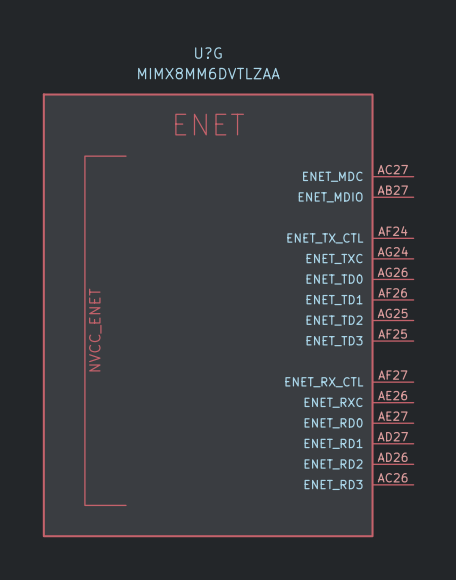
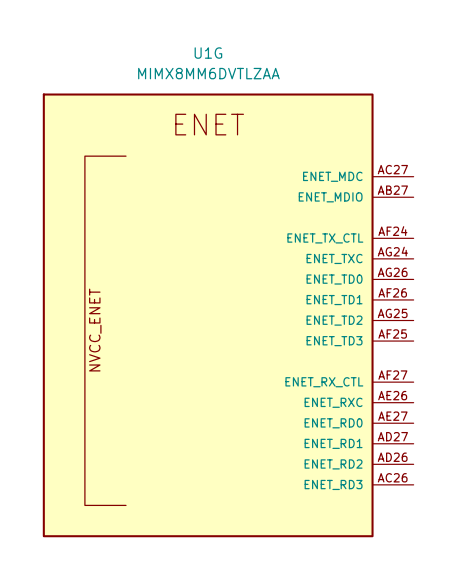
U?G name: U?G (208, 53) -> U1G (208, 53)

